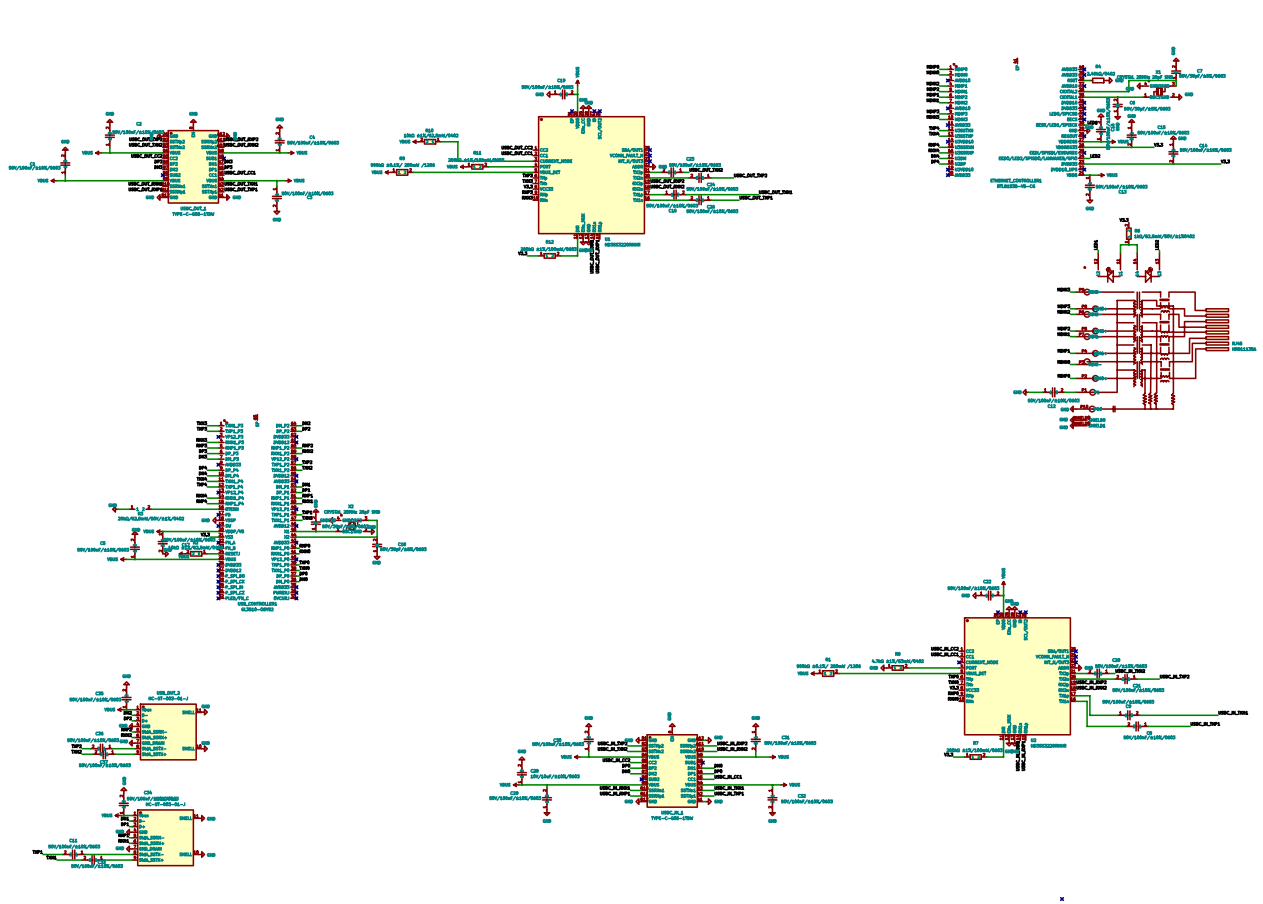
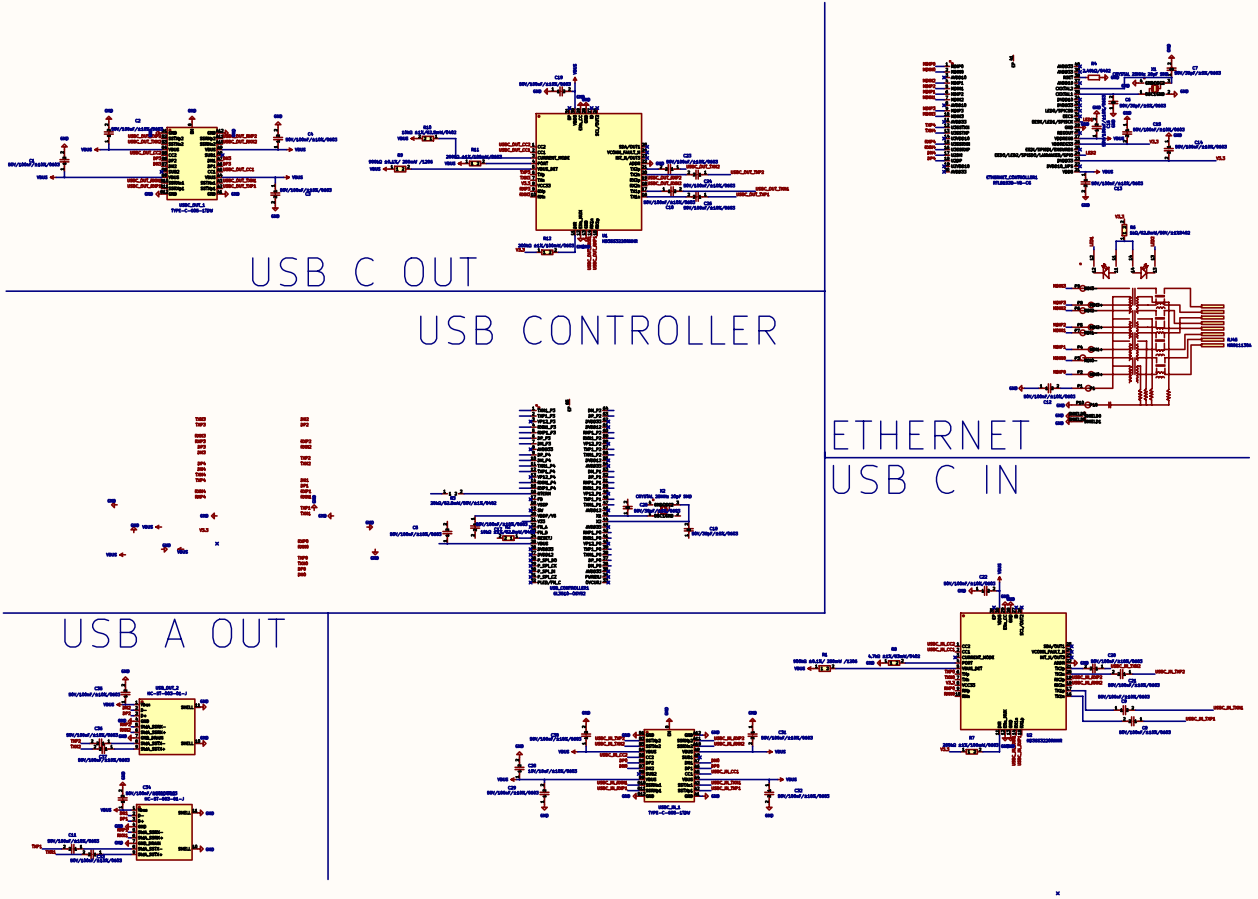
line: none -> (824, 2) (824, 613) (3, 613)
text: none -> USB C OUT (364, 271)
line: none -> (6, 291) (824, 291)
text: none -> USB CONTROLLER (597, 330)
wire: none -> (519, 410) (530, 410)
wire: none -> (608, 410) (613, 410)
wire: none -> (519, 416) (530, 416)
wire: none -> (608, 416) (613, 416)
wire: (207, 425) (218, 425) -> none
wire: (296, 425) (301, 425) -> none
no-connect mark: none -> (530, 421)
no-connect mark: none -> (608, 421)
wire: (207, 431) (218, 431) -> none
wire: (296, 431) (301, 431) -> none
wire: none -> (519, 427) (530, 427)
no-connect mark: none -> (608, 427)
no-connect mark: (218, 436) -> none
no-connect mark: (296, 436) -> none
wire: none -> (519, 432) (530, 432)
wire: none -> (608, 432) (613, 432)
text: none -> ETHERNET (931, 434)
wire: (207, 442) (218, 442) -> none
no-connect mark: (296, 442) -> none
wire: none -> (519, 438) (530, 438)
wire: none -> (608, 438) (613, 438)
wire: (207, 448) (218, 448) -> none
wire: (296, 448) (301, 448) -> none
wire: none -> (519, 443) (530, 443)
no-connect mark: none -> (608, 443)
wire: (207, 453) (218, 453) -> none
wire: (296, 453) (301, 453) -> none
no-connect mark: none -> (530, 449)
wire: none -> (608, 449) (613, 449)
wire: (207, 459) (218, 459) -> none
no-connect mark: (296, 459) -> none
wire: none -> (519, 454) (530, 454)
wire: none -> (608, 454) (613, 454)
line: none -> (824, 457) (1249, 457)
no-connect mark: (218, 464) -> none
wire: (296, 464) (301, 464) -> none
wire: none -> (519, 460) (530, 460)
no-connect mark: none -> (608, 460)
wire: (207, 470) (218, 470) -> none
wire: (296, 470) (301, 470) -> none
wire: none -> (519, 465) (530, 465)
no-connect mark: none -> (608, 465)
wire: (207, 475) (218, 475) -> none
no-connect mark: (296, 475) -> none
wire: none -> (519, 471) (530, 471)
wire: none -> (608, 471) (613, 471)
wire: (207, 481) (218, 481) -> none
no-connect mark: (296, 481) -> none
no-connect mark: none -> (530, 477)
wire: none -> (608, 477) (613, 477)
text: none -> USB C IN (924, 479)
wire: (207, 486) (218, 486) -> none
wire: (296, 486) (301, 486) -> none
wire: none -> (519, 482) (530, 482)
wire: none -> (608, 482) (613, 482)
no-connect mark: (218, 492) -> none
wire: (296, 492) (301, 492) -> none
wire: none -> (519, 488) (530, 488)
wire: none -> (608, 488) (613, 488)
wire: (207, 498) (218, 498) -> none
wire: (296, 498) (301, 498) -> none
wire: none -> (430, 493) (441, 493)
wire: none -> (464, 493) (530, 493)
no-connect mark: none -> (608, 493)
wire: (207, 503) (218, 503) -> none
wire: (296, 503) (301, 503) -> none
no-connect mark: none -> (530, 499)
wire: none -> (608, 499) (613, 499)
part position: (257, 506) -> (569, 490)
part position: (140, 508) -> (452, 492)
wire: (118, 509) (129, 509) -> none
wire: (151, 509) (218, 509) -> none
no-connect mark: (296, 509) -> none
wire: none -> (608, 504) (613, 504)
wire: none -> (680, 504) (688, 504) (688, 521) (608, 521)
no-connect mark: (218, 514) -> none
wire: (296, 514) (301, 514) -> none
no-connect mark: none -> (530, 510)
no-connect mark: none -> (608, 510)
wire: (296, 520) (301, 520) -> none
wire: (368, 520) (377, 520) (377, 537) (296, 537) -> none
wire: none -> (475, 515) (530, 515)
wire: none -> (608, 515) (647, 515)
part position: (315, 523) -> (627, 507)
part position: (352, 523) -> (663, 507)
no-connect mark: (218, 525) -> none
no-connect mark: (296, 525) -> none
wire: none -> (522, 521) (530, 521)
wire: (162, 531) (218, 531) -> none
wire: (296, 531) (335, 531) -> none
no-connect mark: none -> (530, 527)
no-connect mark: none -> (608, 527)
wire: (210, 537) (218, 537) -> none
wire: none -> (608, 532) (611, 532)
part position: (162, 542) -> (475, 527)
no-connect mark: (218, 542) -> none
no-connect mark: (296, 542) -> none
wire: none -> (519, 538) (530, 538)
wire: none -> (608, 538) (611, 538)
part position: (377, 545) -> (688, 529)
part position: (134, 548) -> (447, 532)
wire: (296, 548) (299, 548) -> none
wire: none -> (439, 543) (530, 543)
no-connect mark: none -> (608, 543)
part position: (196, 553) -> (508, 538)
wire: (207, 553) (218, 553) -> none
wire: (296, 553) (299, 553) -> none
no-connect mark: none -> (530, 549)
wire: none -> (608, 549) (611, 549)
wire: (126, 559) (218, 559) -> none
no-connect mark: (296, 559) -> none
no-connect mark: none -> (530, 554)
wire: none -> (608, 554) (611, 554)
no-connect mark: (218, 564) -> none
wire: (296, 564) (299, 564) -> none
no-connect mark: none -> (530, 560)
wire: none -> (608, 560) (611, 560)
no-connect mark: (218, 570) -> none
wire: (296, 570) (299, 570) -> none
no-connect mark: none -> (530, 565)
wire: none -> (608, 565) (611, 565)
no-connect mark: (218, 576) -> none
wire: (296, 576) (299, 576) -> none
no-connect mark: none -> (530, 571)
no-connect mark: none -> (608, 571)
no-connect mark: (218, 581) -> none
wire: (296, 581) (299, 581) -> none
no-connect mark: none -> (530, 576)
no-connect mark: none -> (608, 576)
no-connect mark: (218, 587) -> none
no-connect mark: (296, 587) -> none
no-connect mark: none -> (530, 582)
no-connect mark: none -> (608, 582)
no-connect mark: (218, 592) -> none
no-connect mark: (296, 592) -> none
no-connect mark: (218, 598) -> none
no-connect mark: (296, 598) -> none
line: none -> (328, 613) (328, 879)
text: none -> USB A OUT (174, 633)

